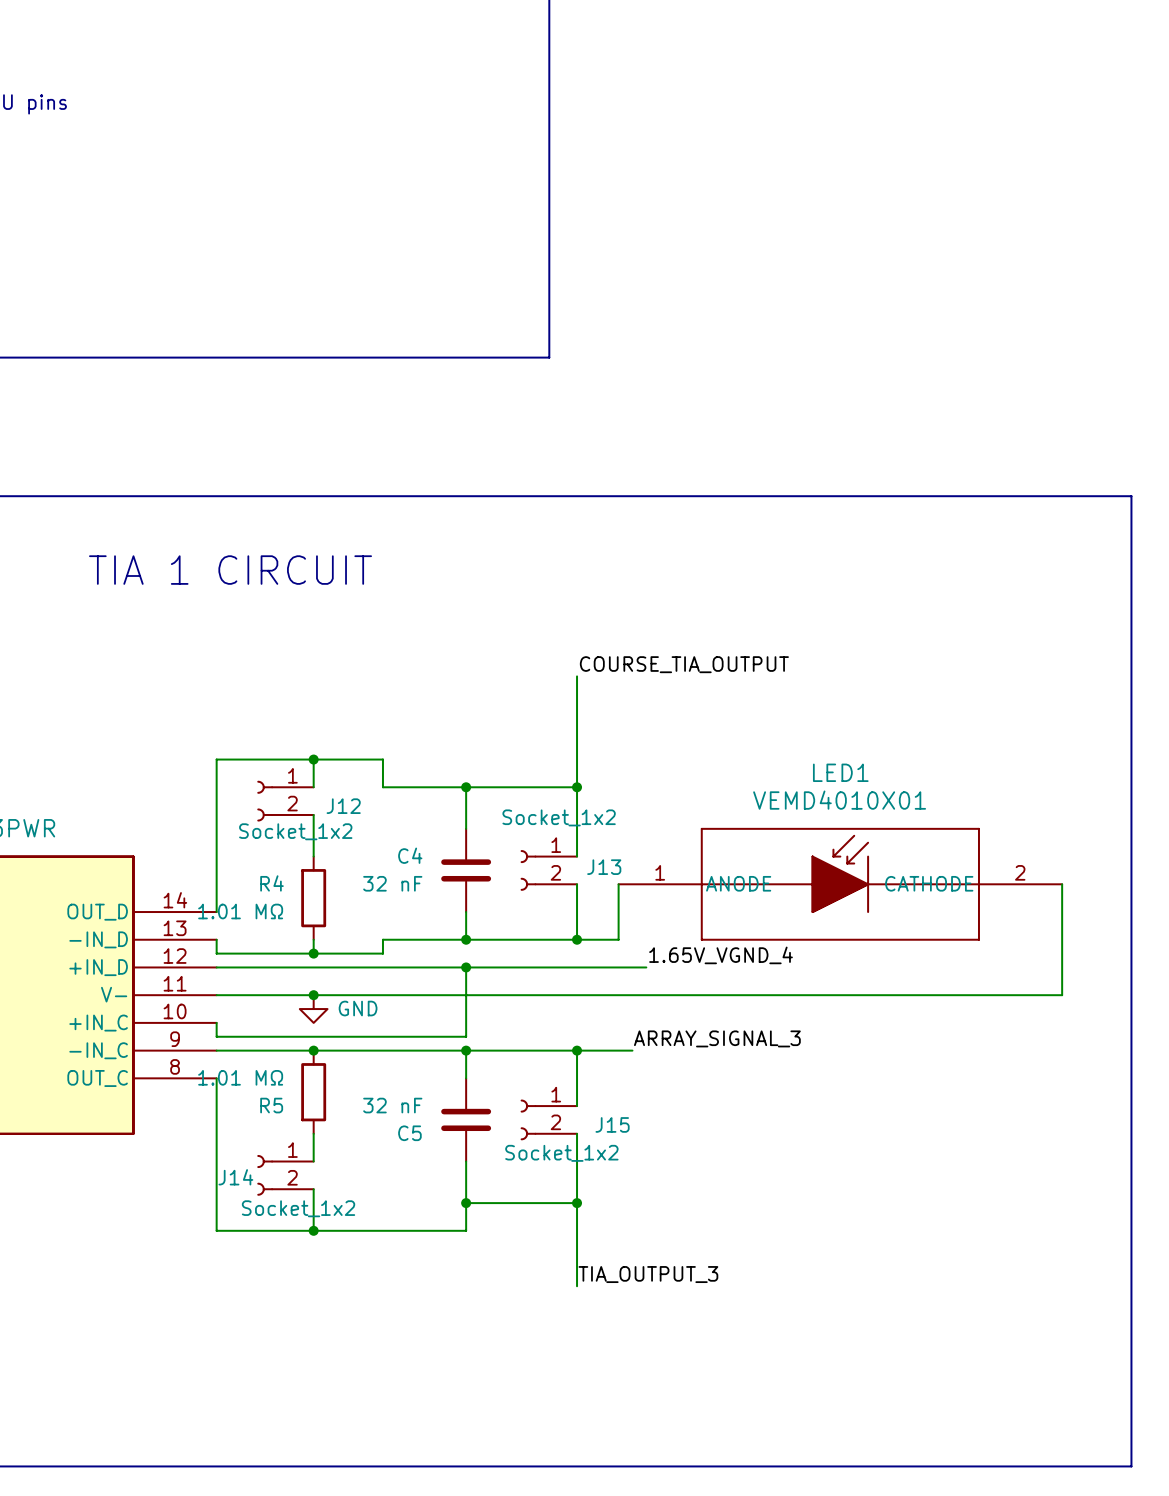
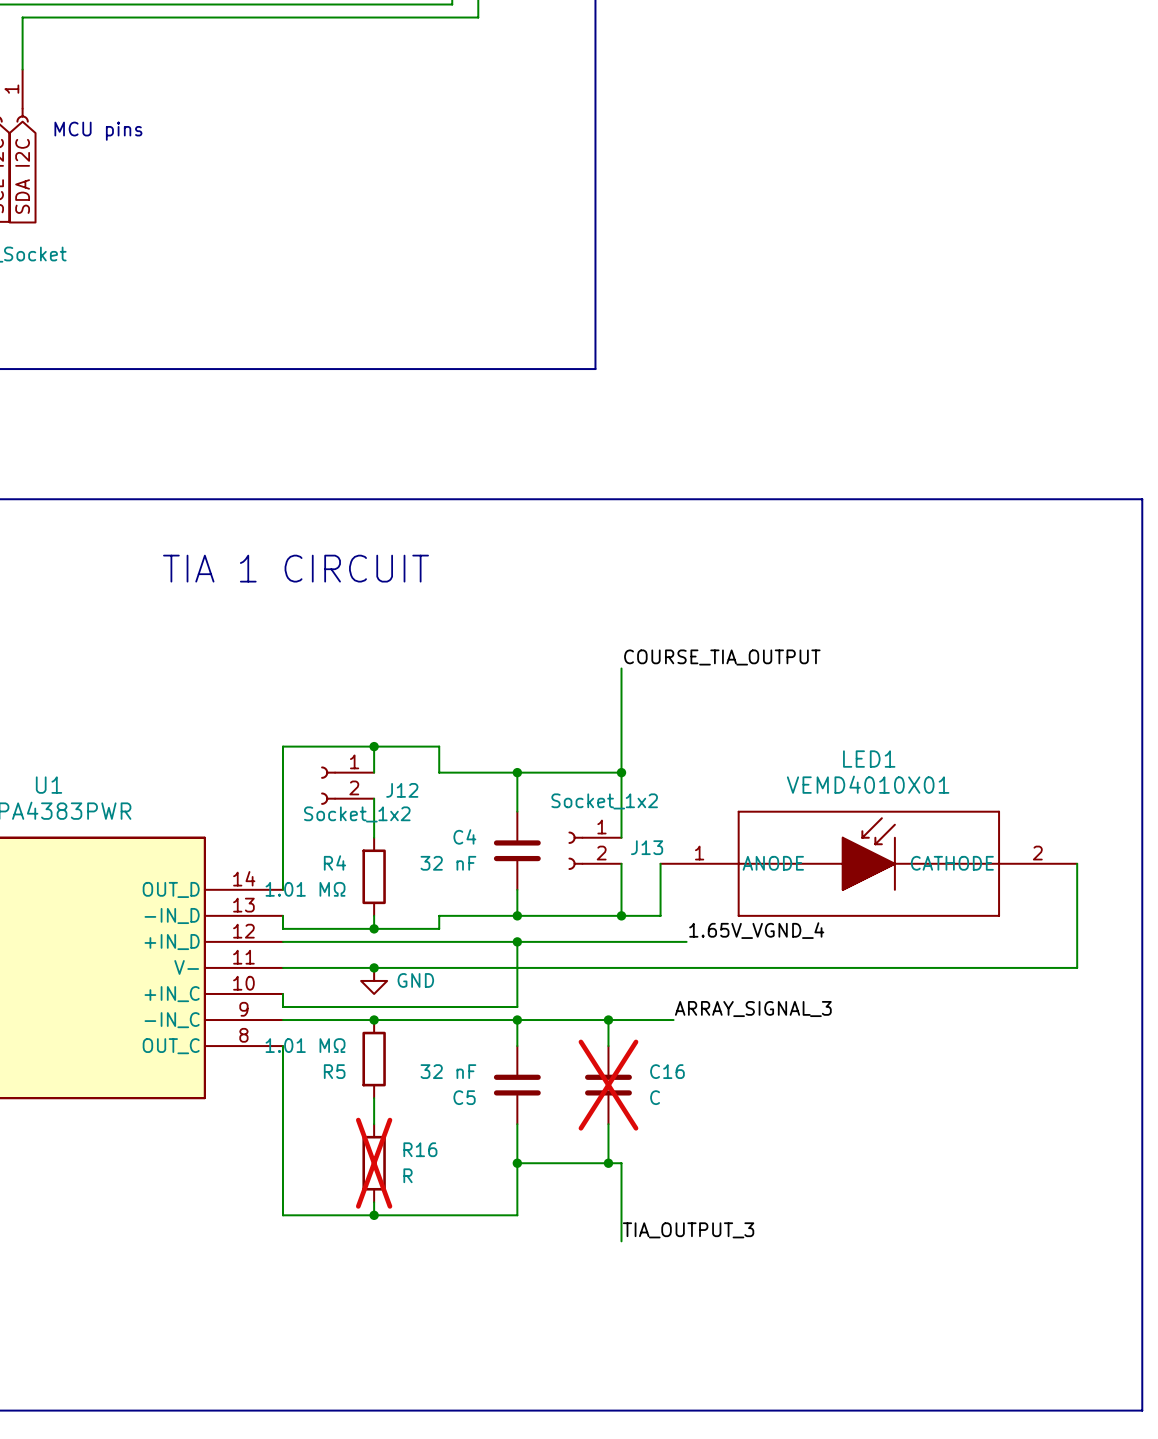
wire: none -> (608, 1020) (608, 1046)
wire: (577, 1050) (577, 1106) -> none
junction position: (577, 1050) -> (608, 1020)
J15: Socket_1x2 (548, 1119) -> none
C16: none -> C (608, 1085)
wire: (577, 1133) (577, 1203) -> none
J14: Socket_1x2 (285, 1175) -> none
wire: (313, 1189) (313, 1230) -> (608, 1124) (608, 1163)
R16: none -> R (374, 1163)
junction position: (577, 1203) -> (608, 1163)
wire: (216, 1230) (466, 1230) -> (282, 1189) (282, 1215) (517, 1215) (517, 1189)
junction position: (313, 1230) -> (374, 1215)
wire: none -> (374, 1202) (374, 1215)

